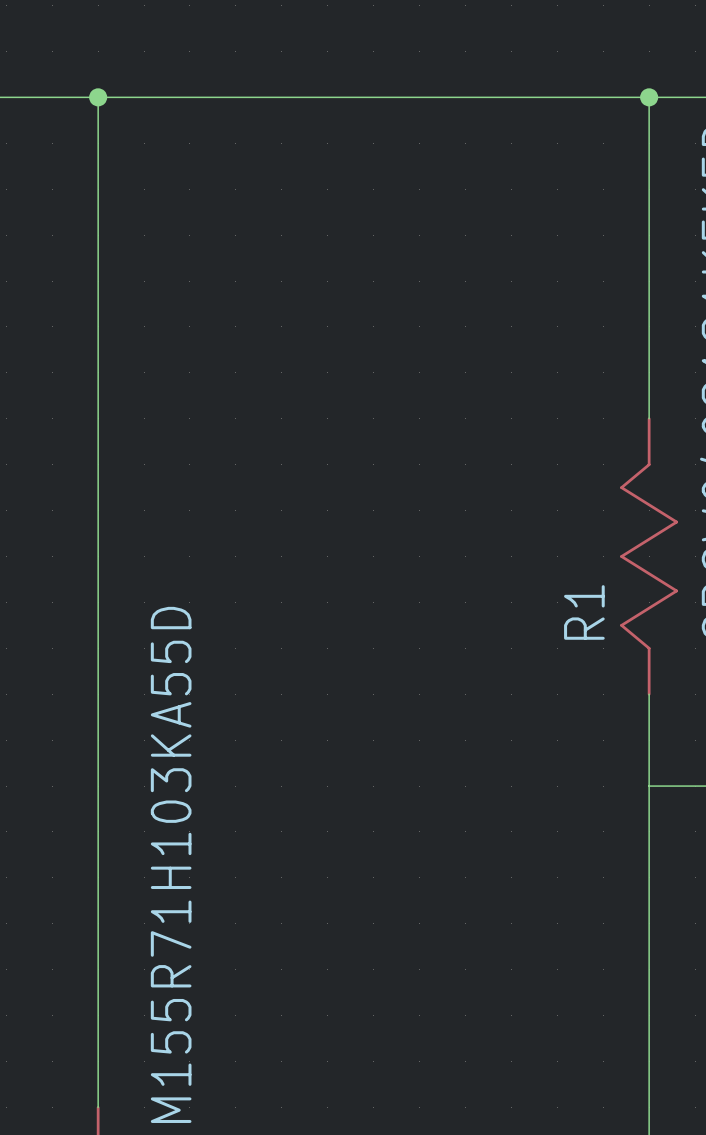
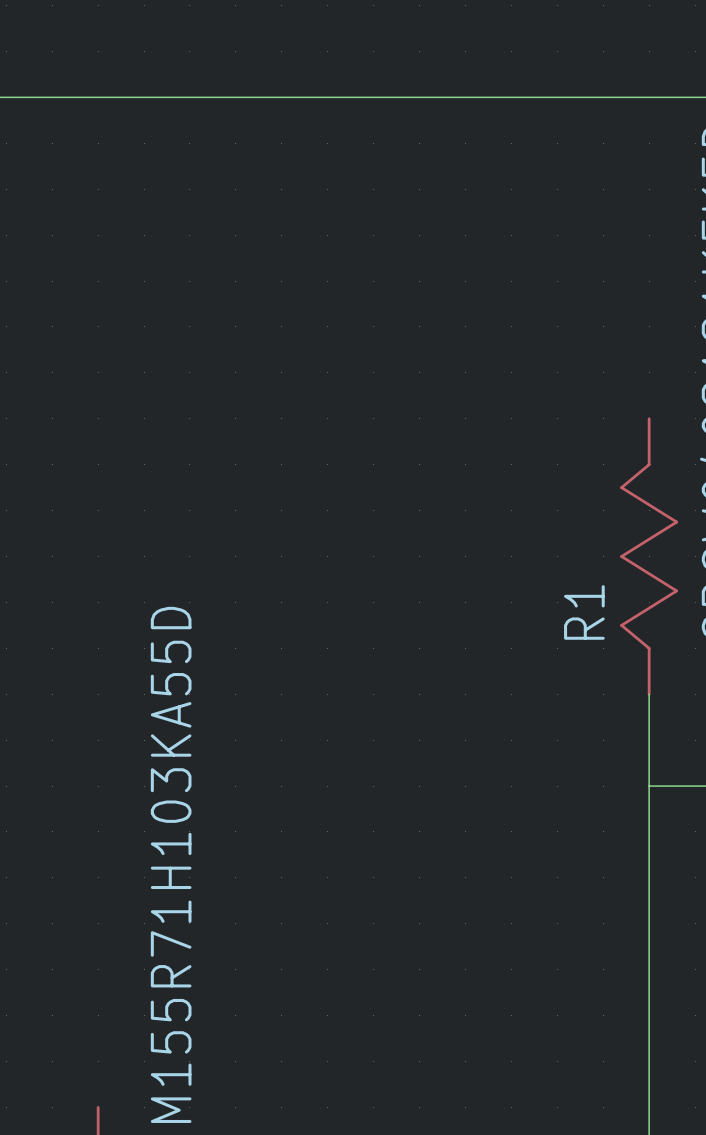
wire: (98, 97) (98, 1107) -> none
junction: (98, 97) -> none
wire: (649, 97) (649, 418) -> none
junction: (649, 97) -> none

